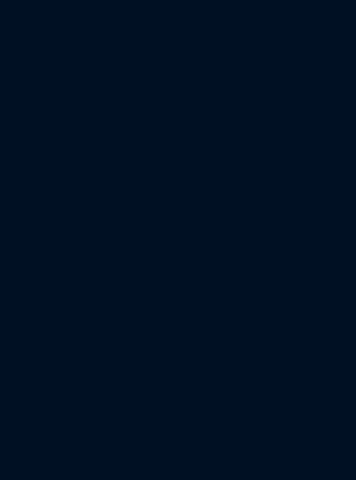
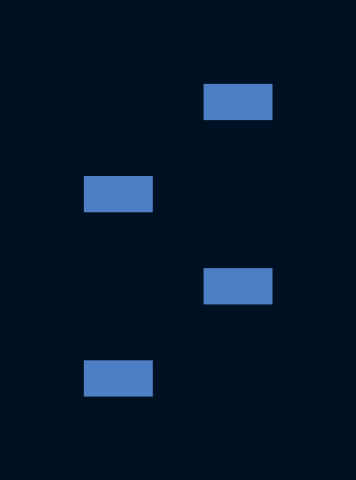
part: none -> (178, 240)

